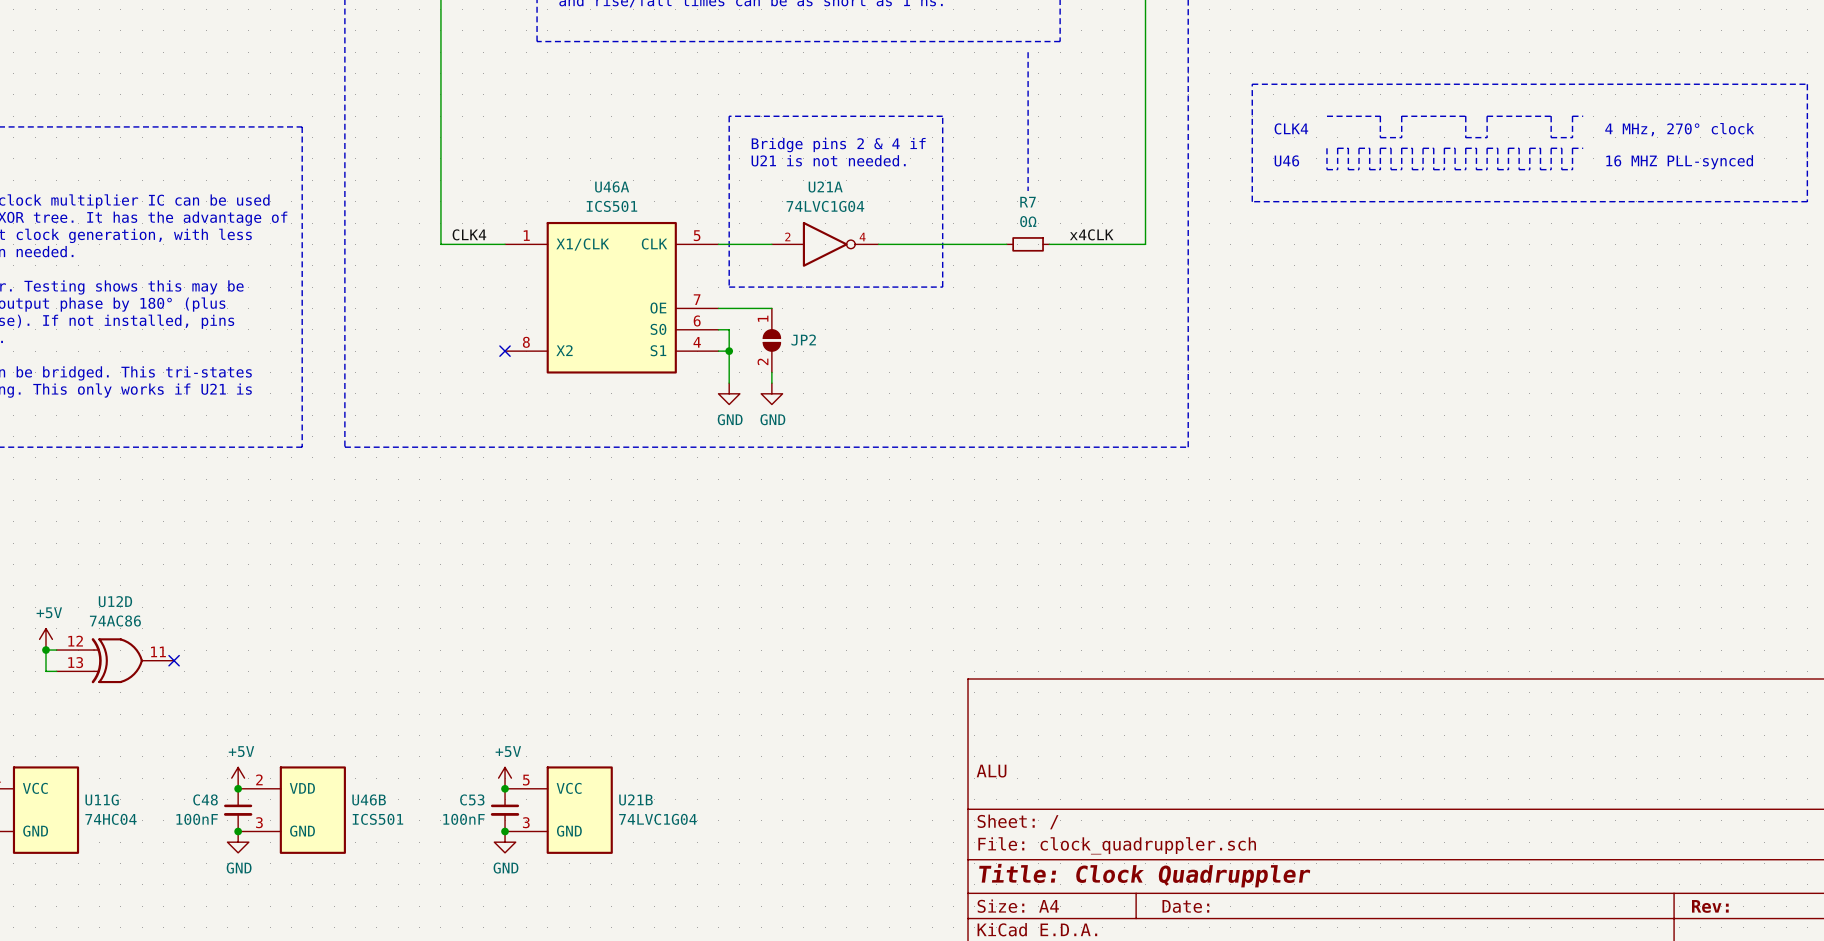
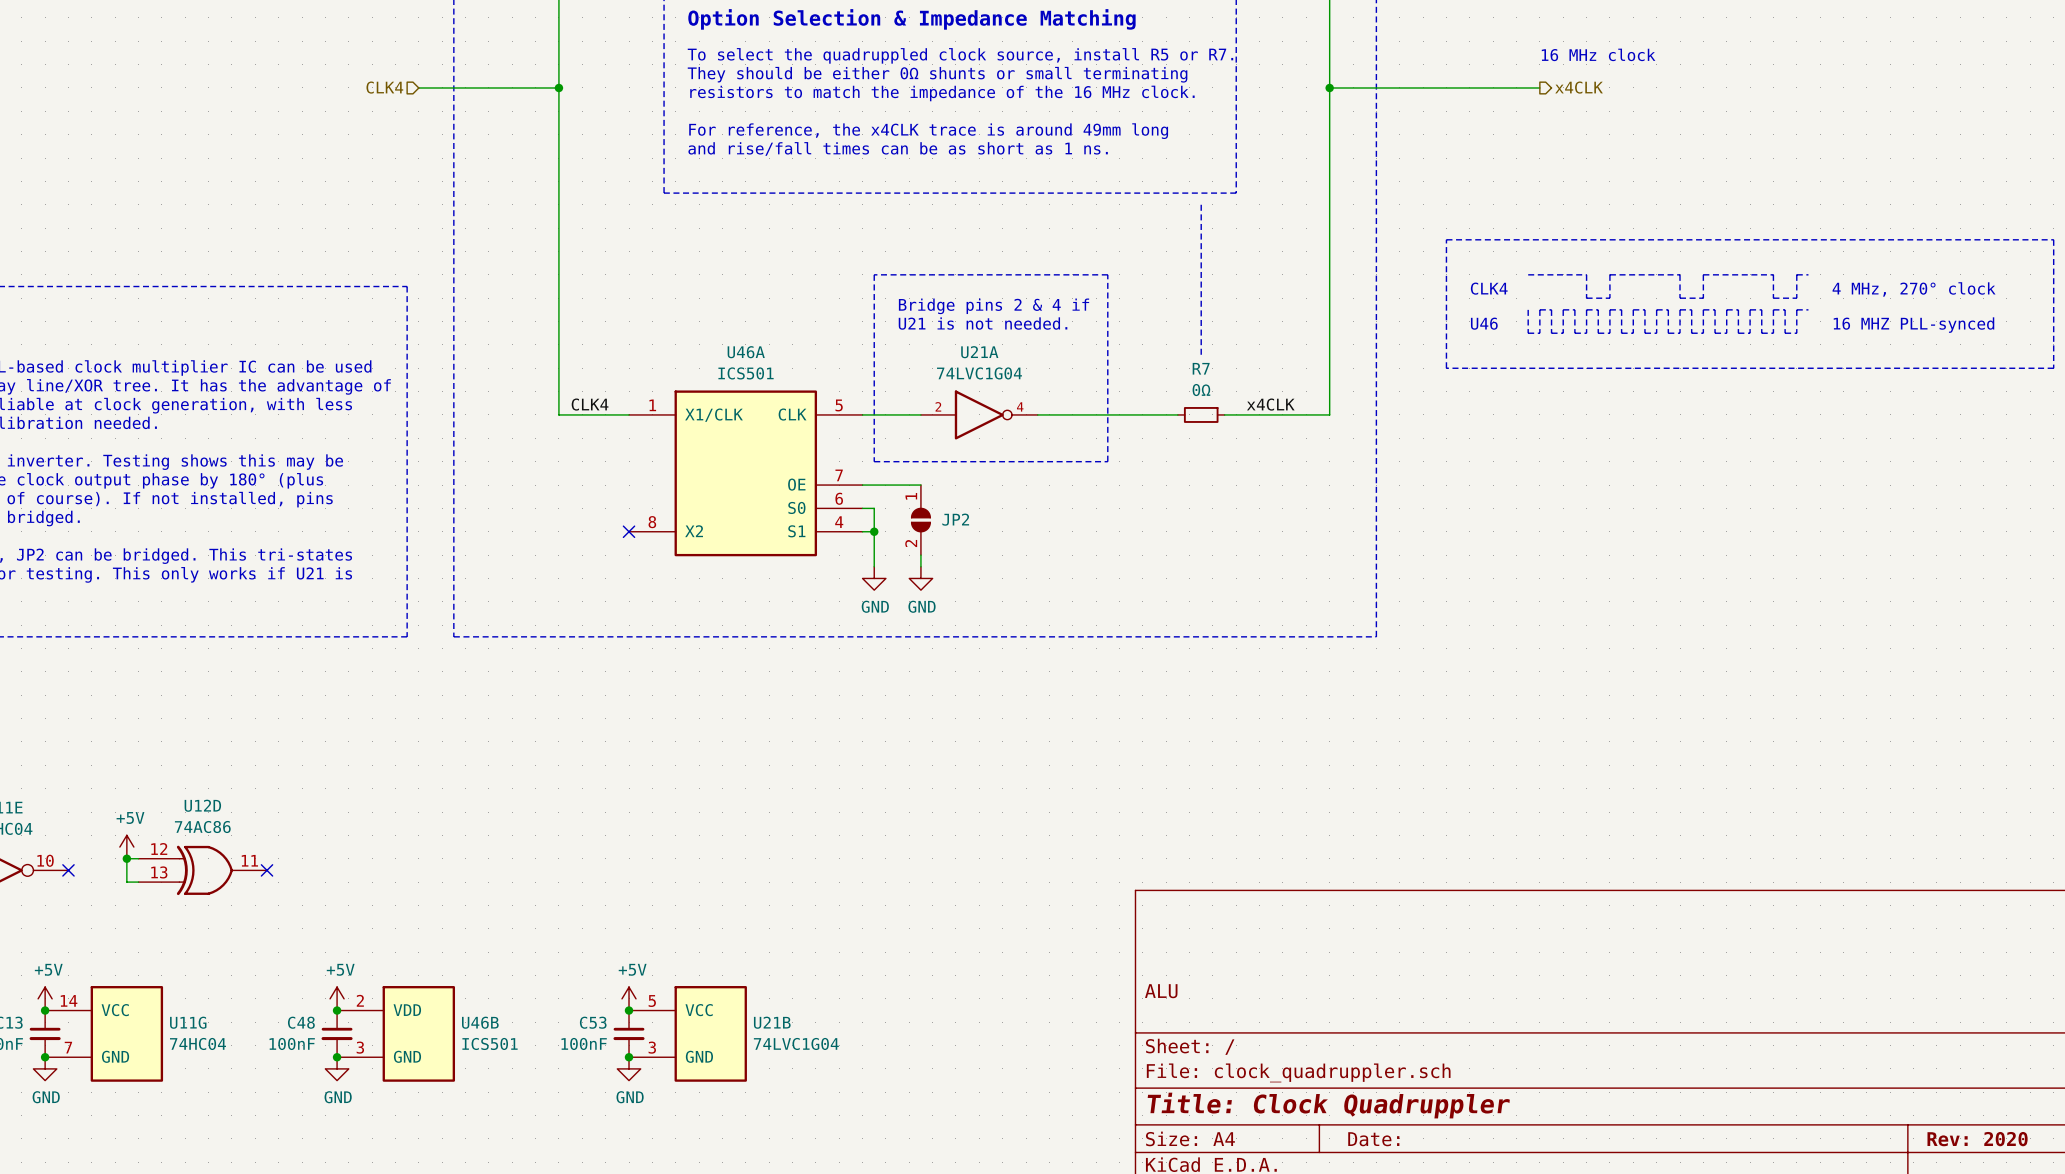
title block: Rev: (1710, 906) -> Rev: 2020 (1977, 1139)

